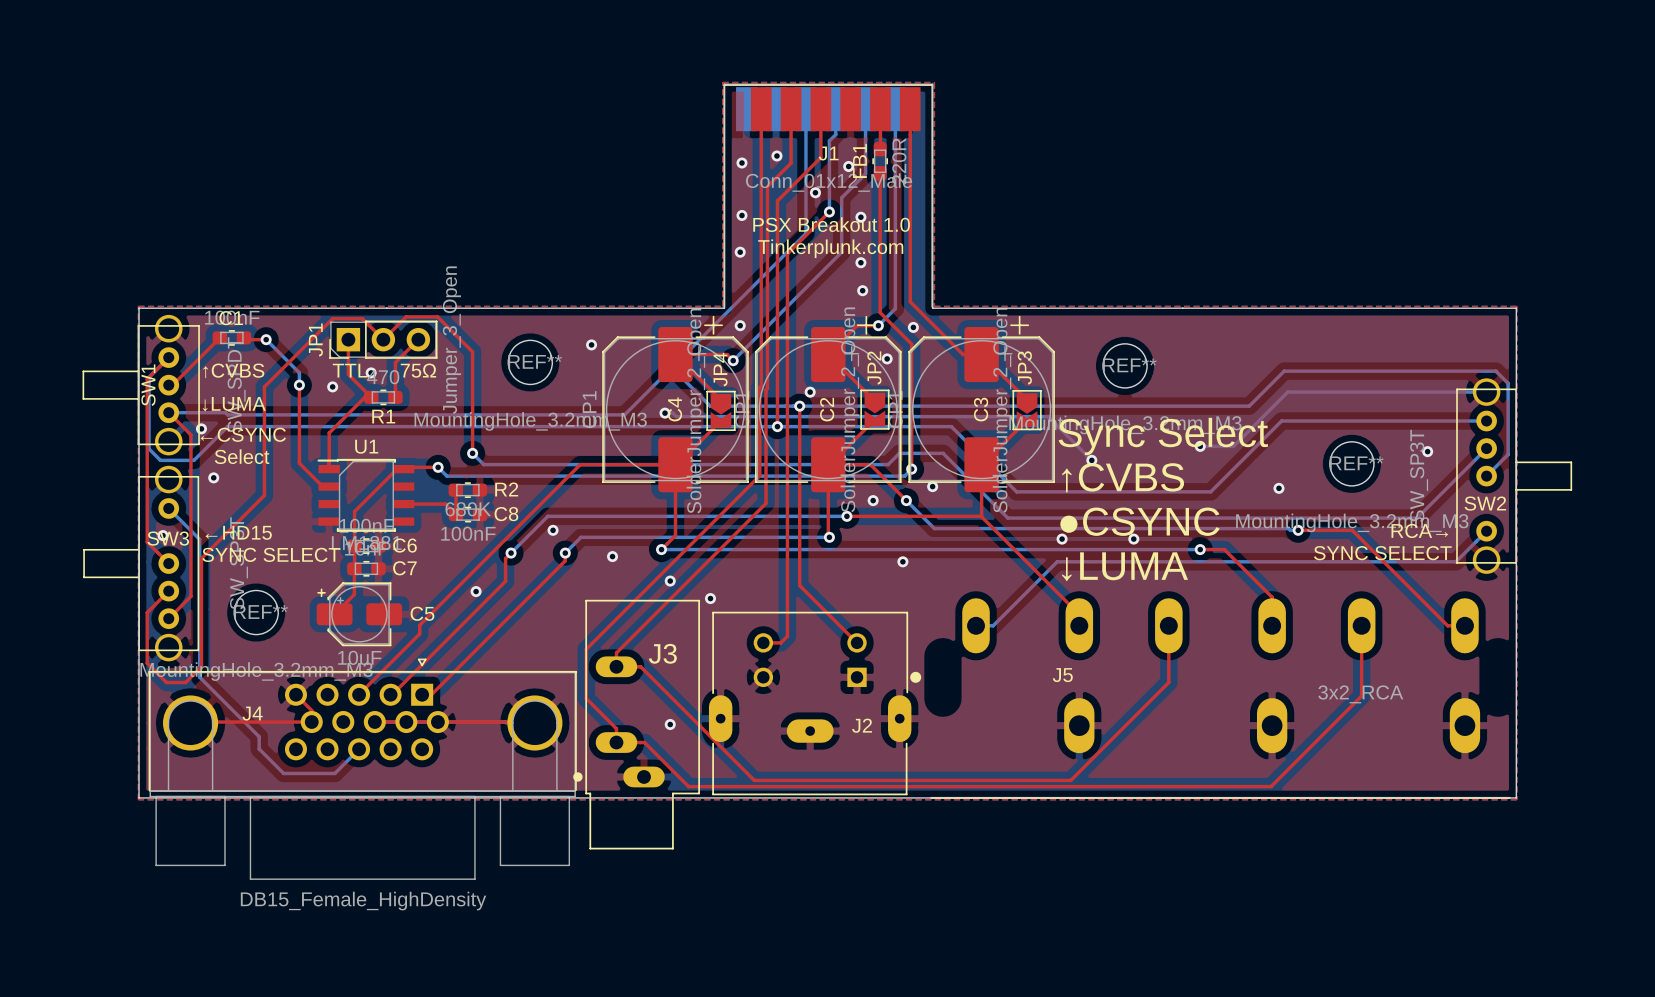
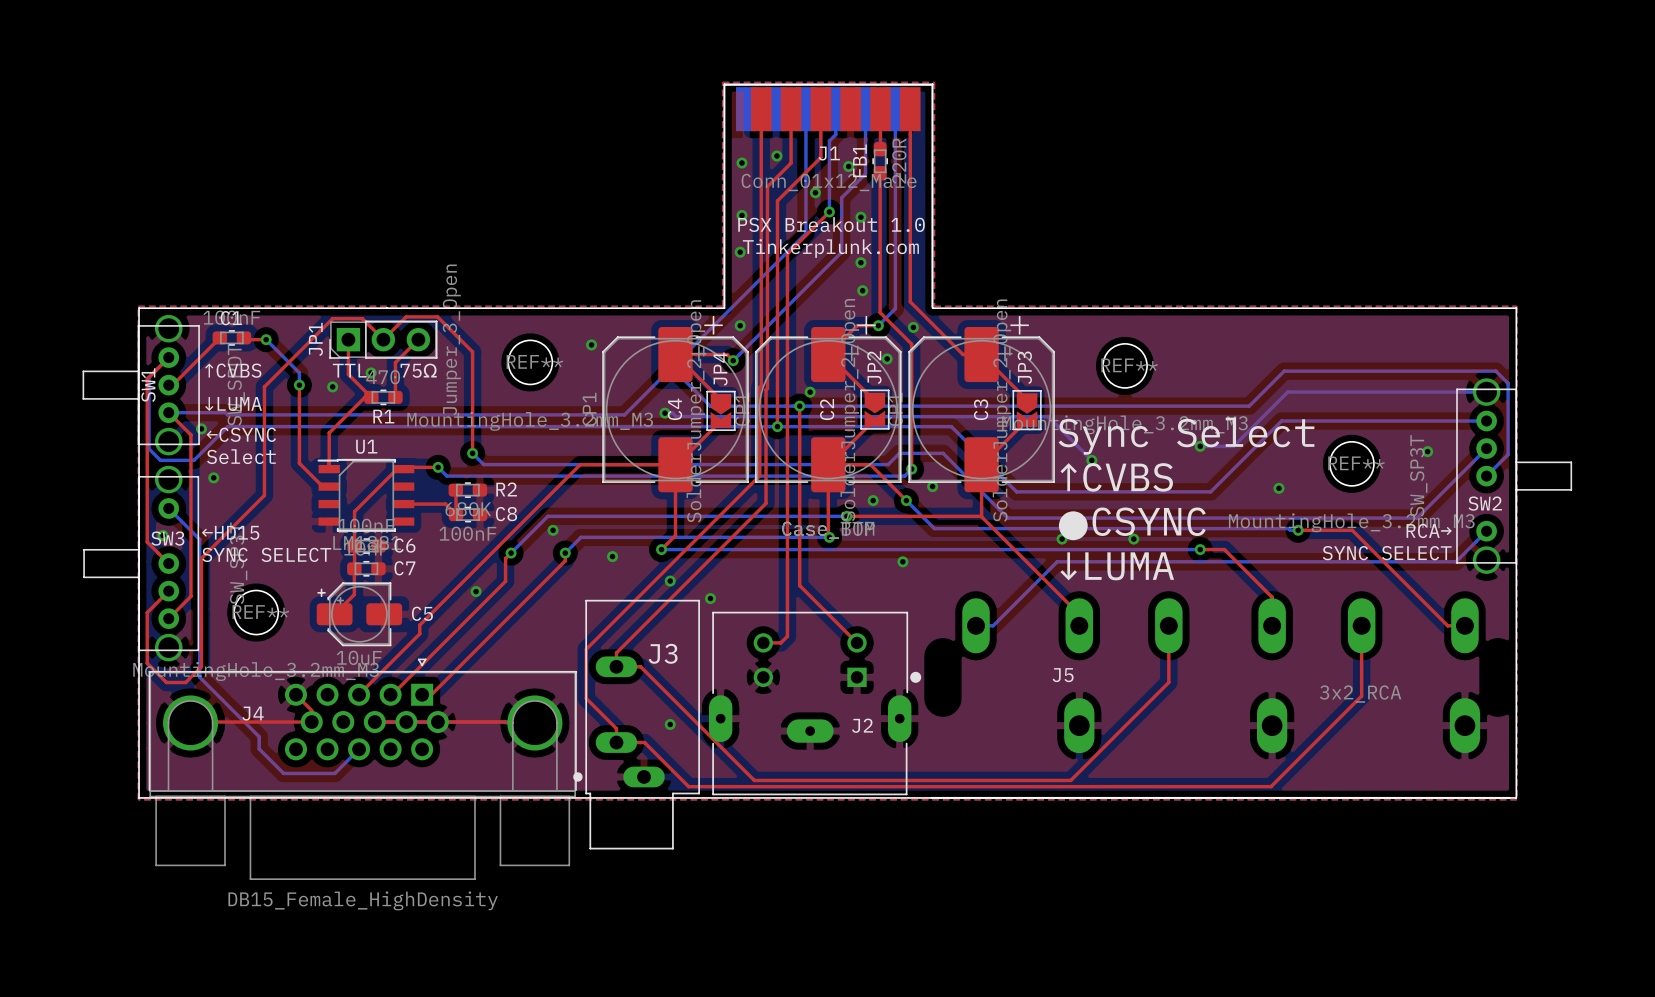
drawing: none -> [782, 521, 875, 539]

